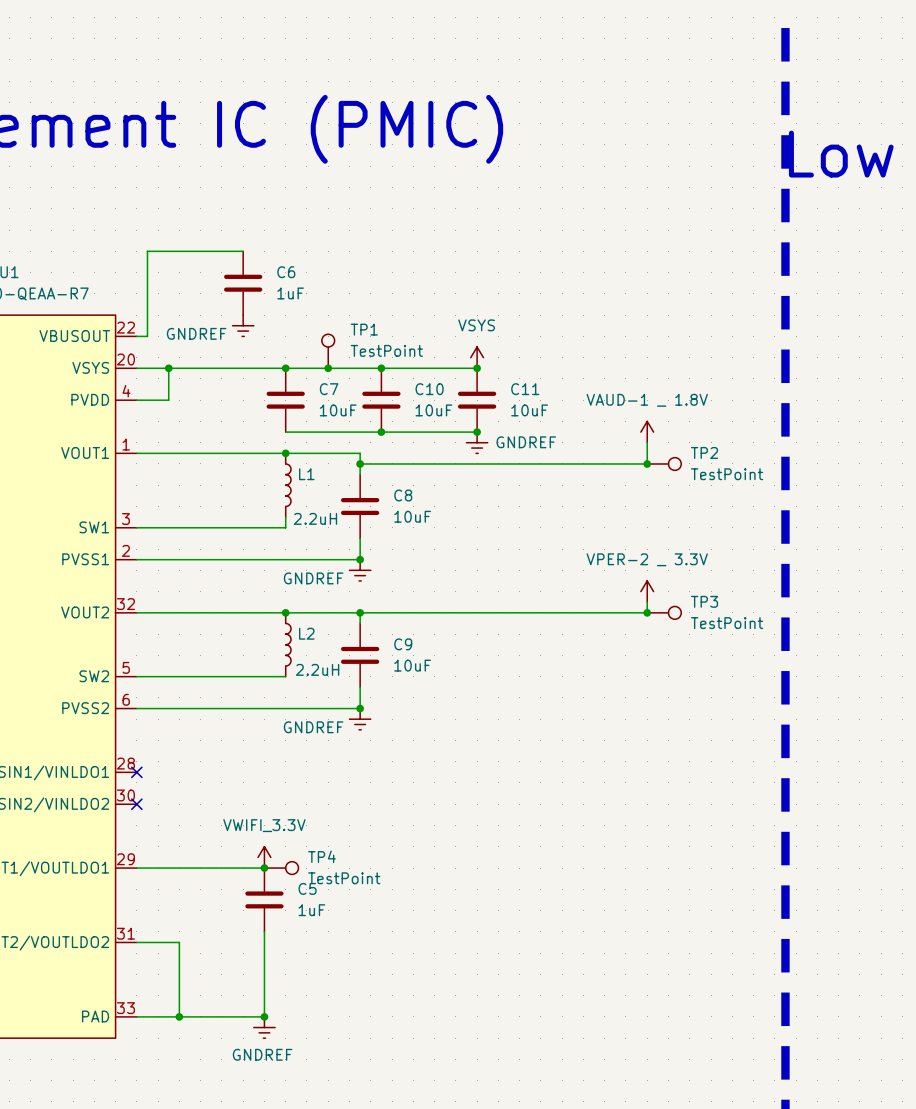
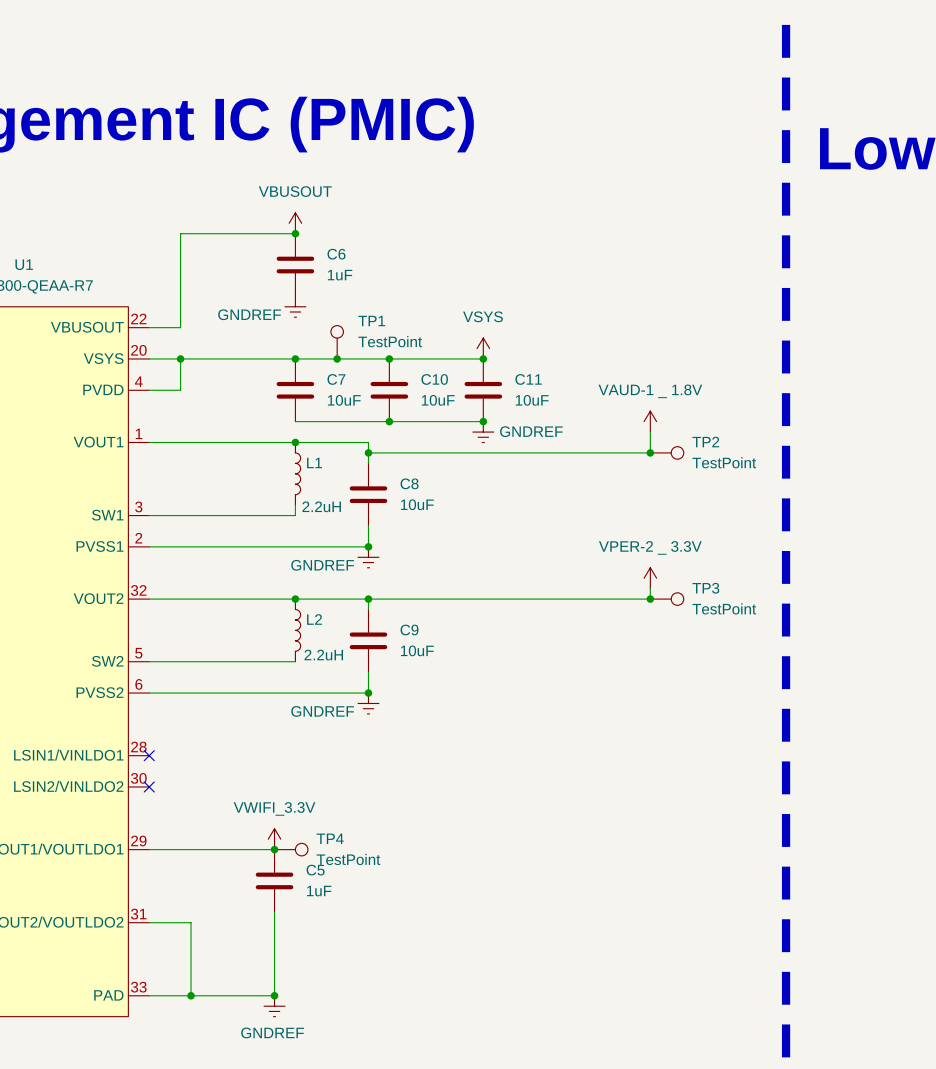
power symbol: none -> VBUSOUT (295, 223)
junction: none -> (295, 233)
wire: (243, 251) (147, 251) (147, 336) -> (295, 233) (180, 233) (180, 327) (159, 327)
C6 position: (243, 283) -> (295, 265)
power symbol position: GNDREF (243, 325) -> GNDREF (295, 306)

